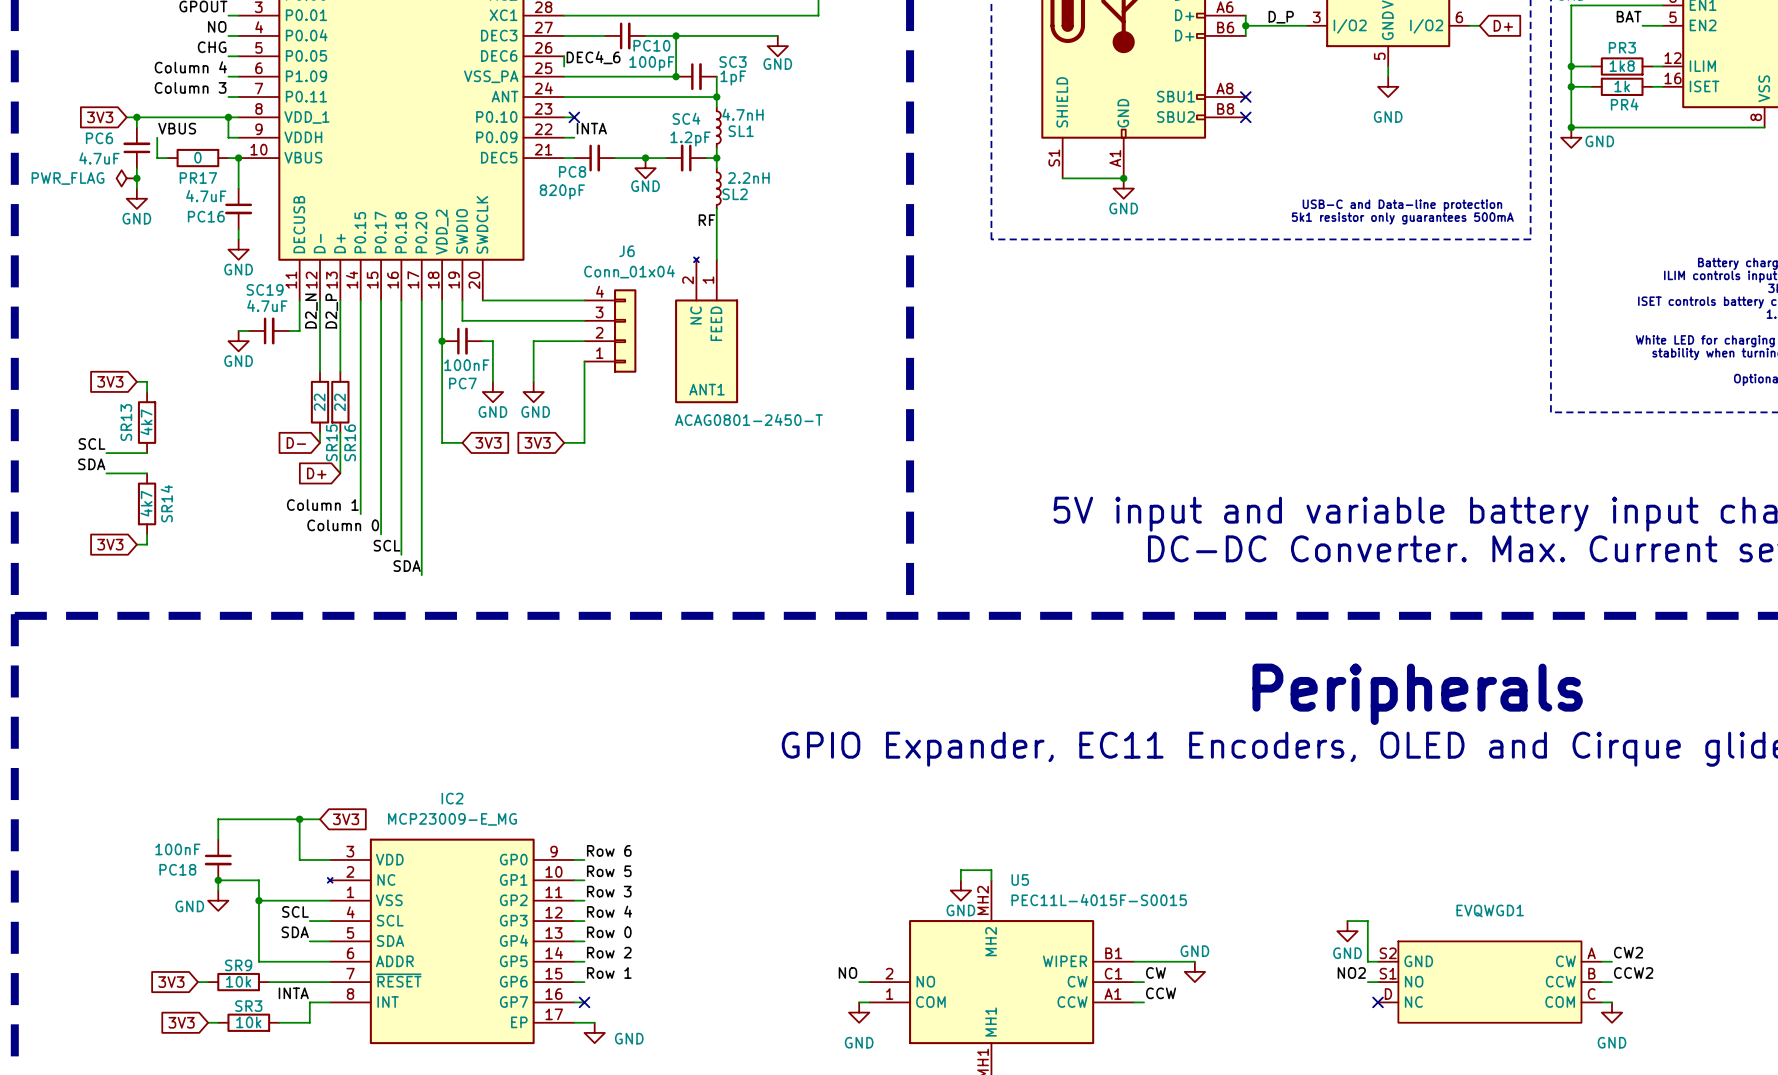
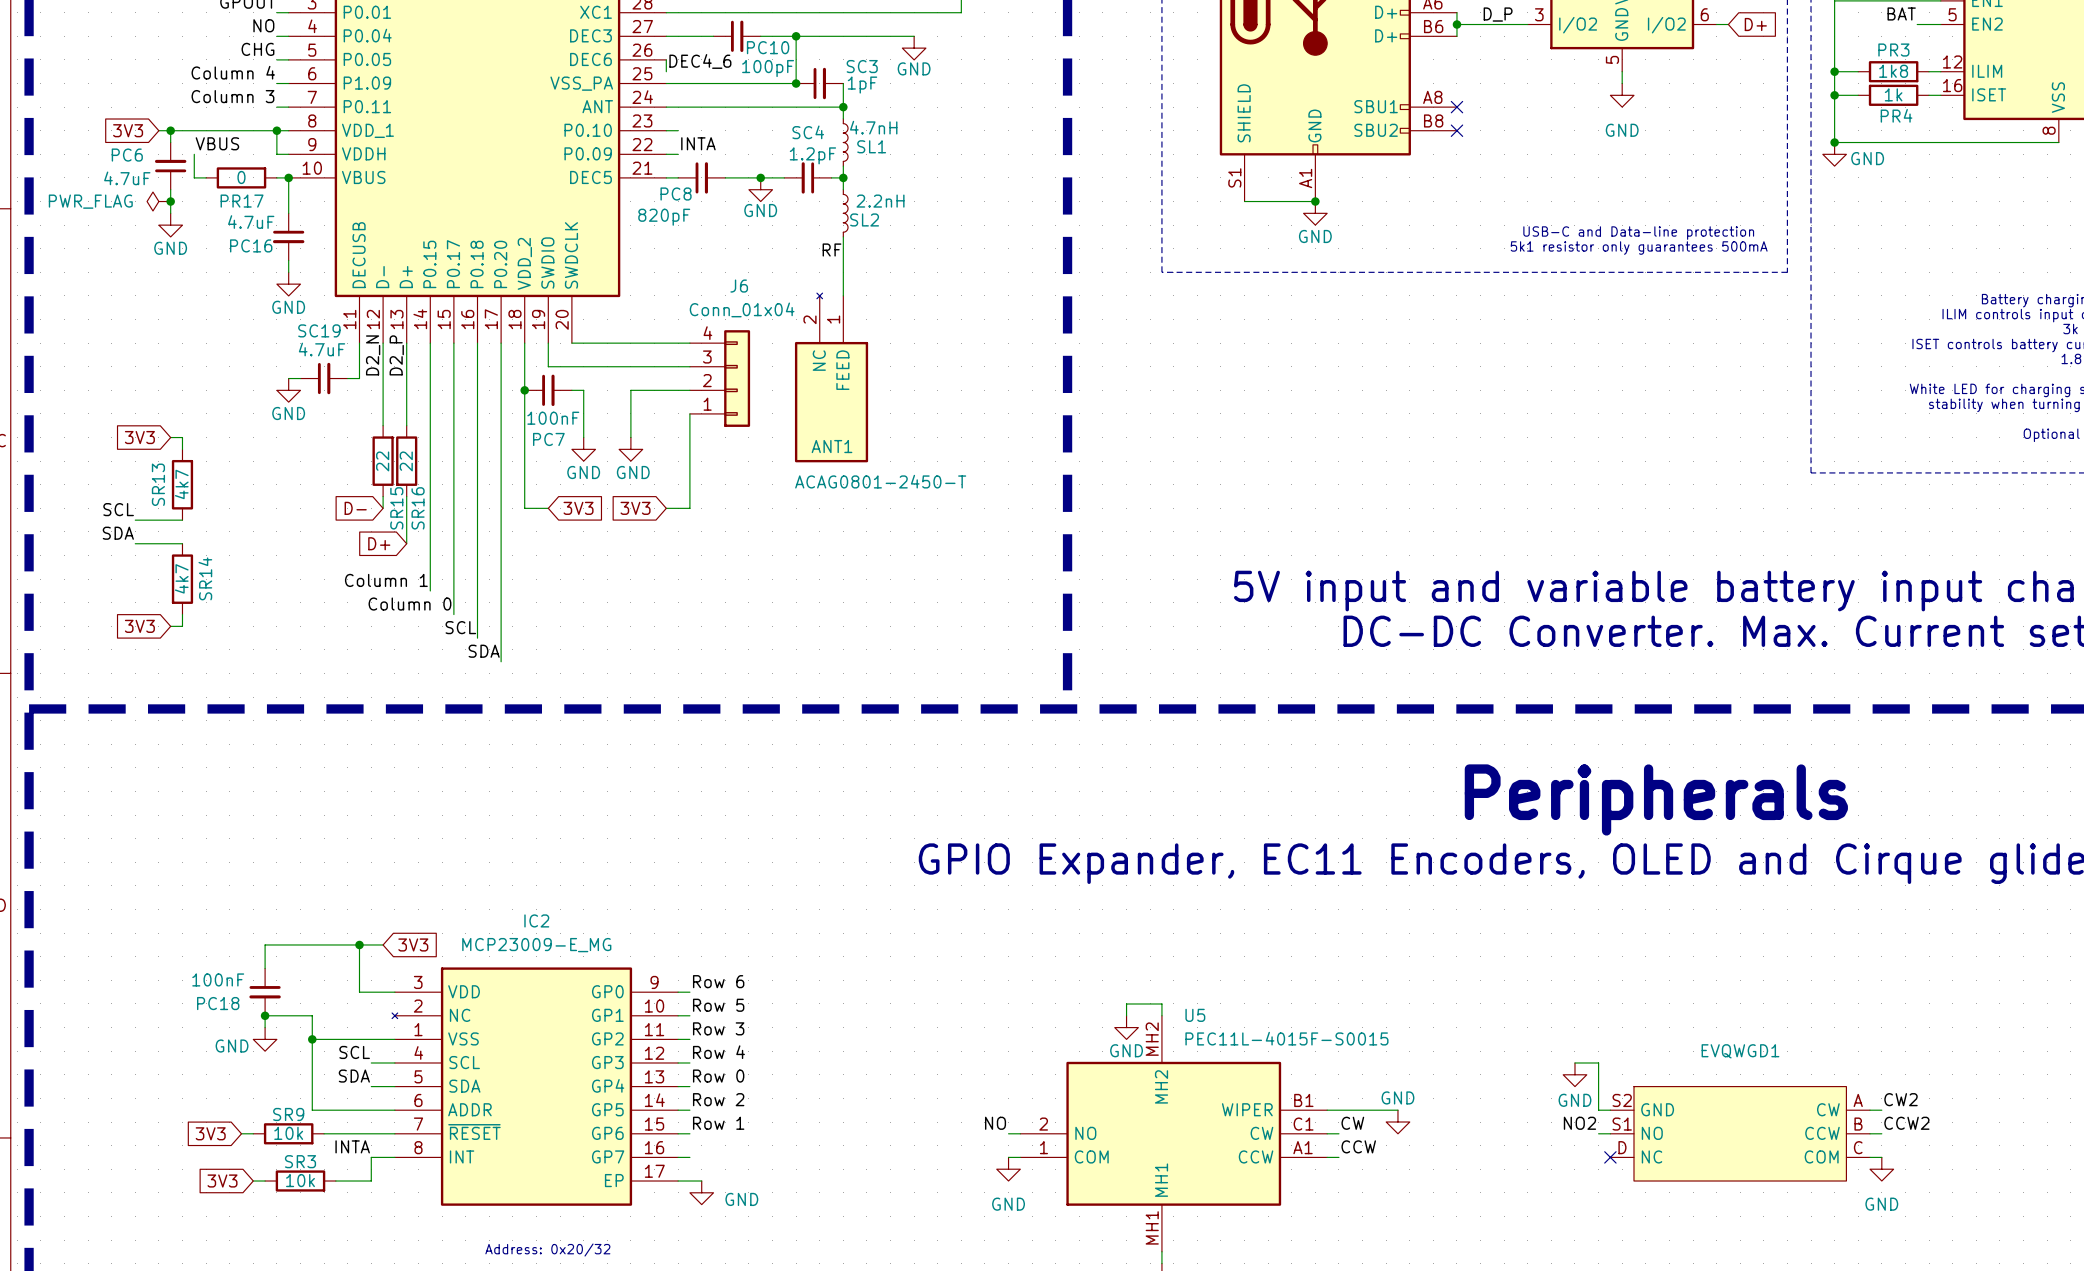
no-connect mark: (574, 117) -> none
no-connect mark: (584, 1002) -> none

